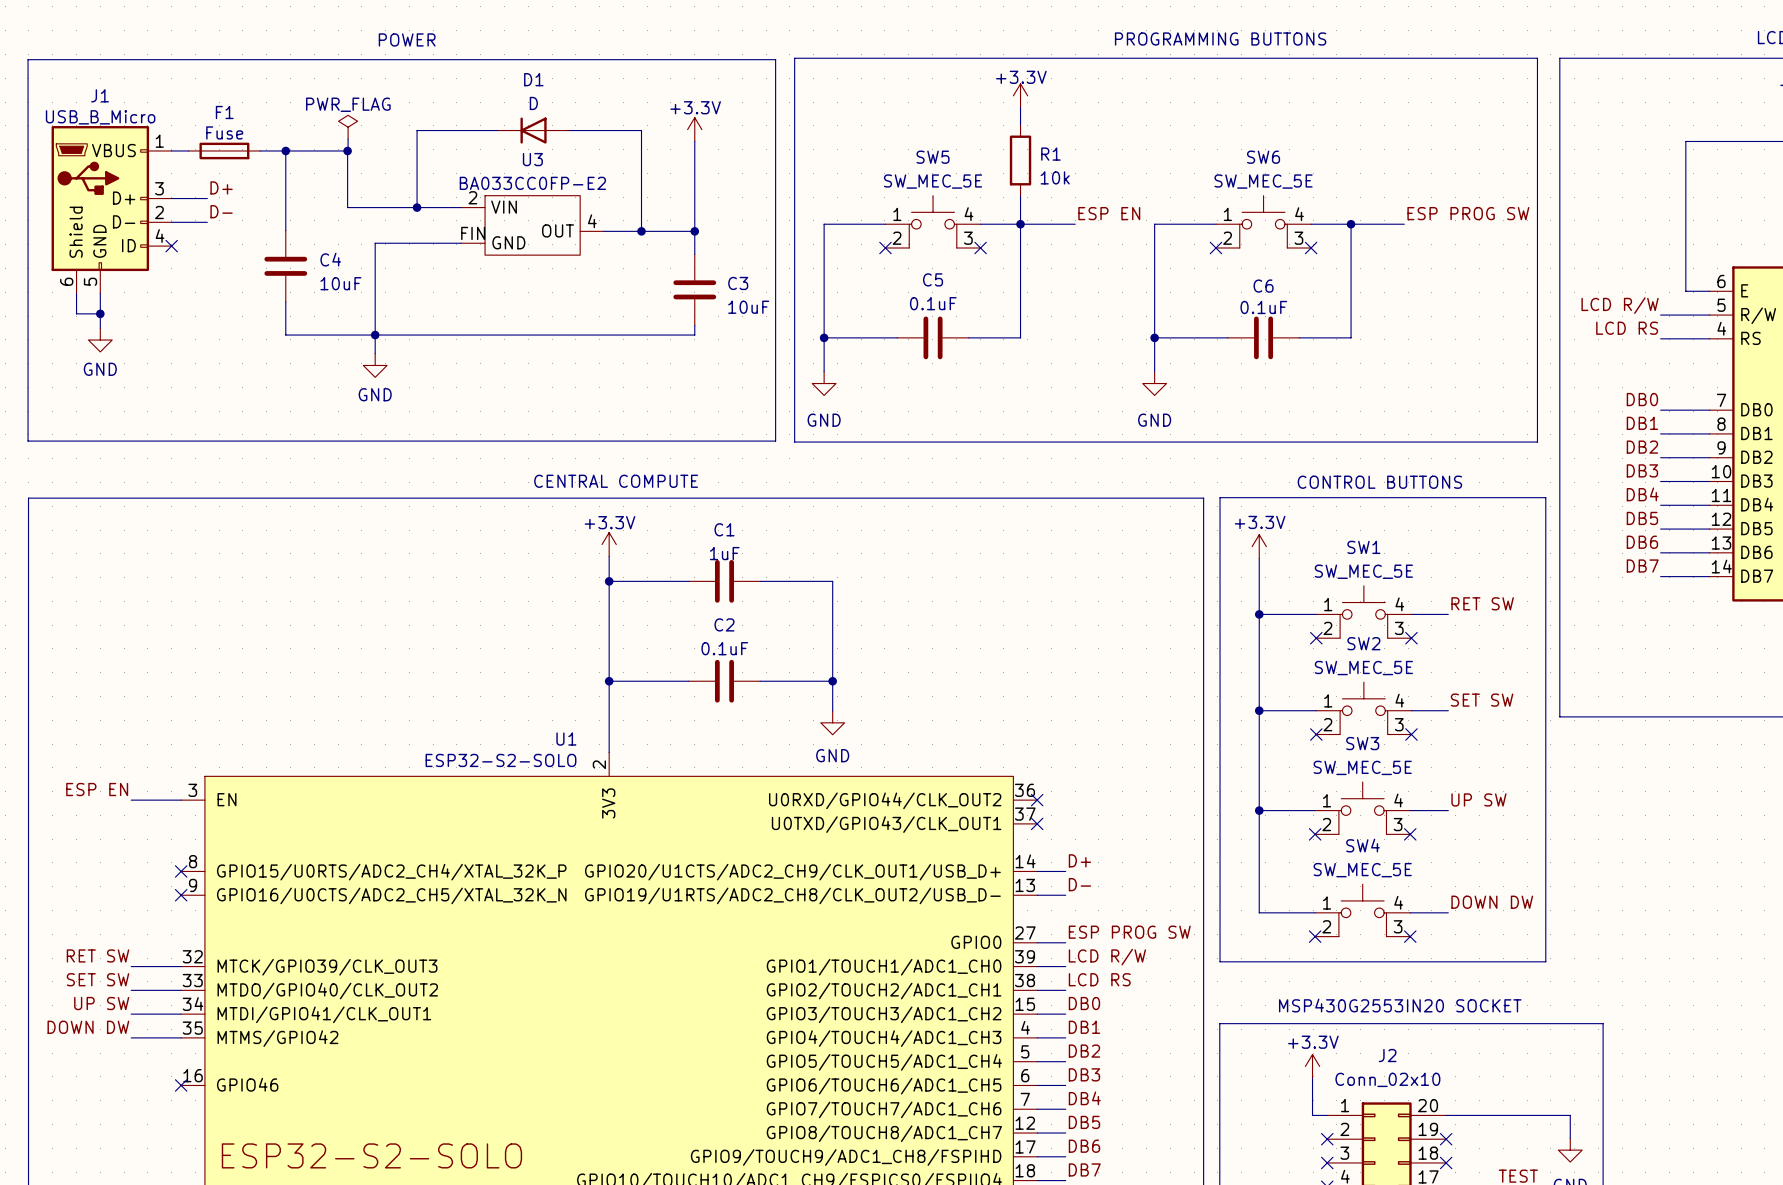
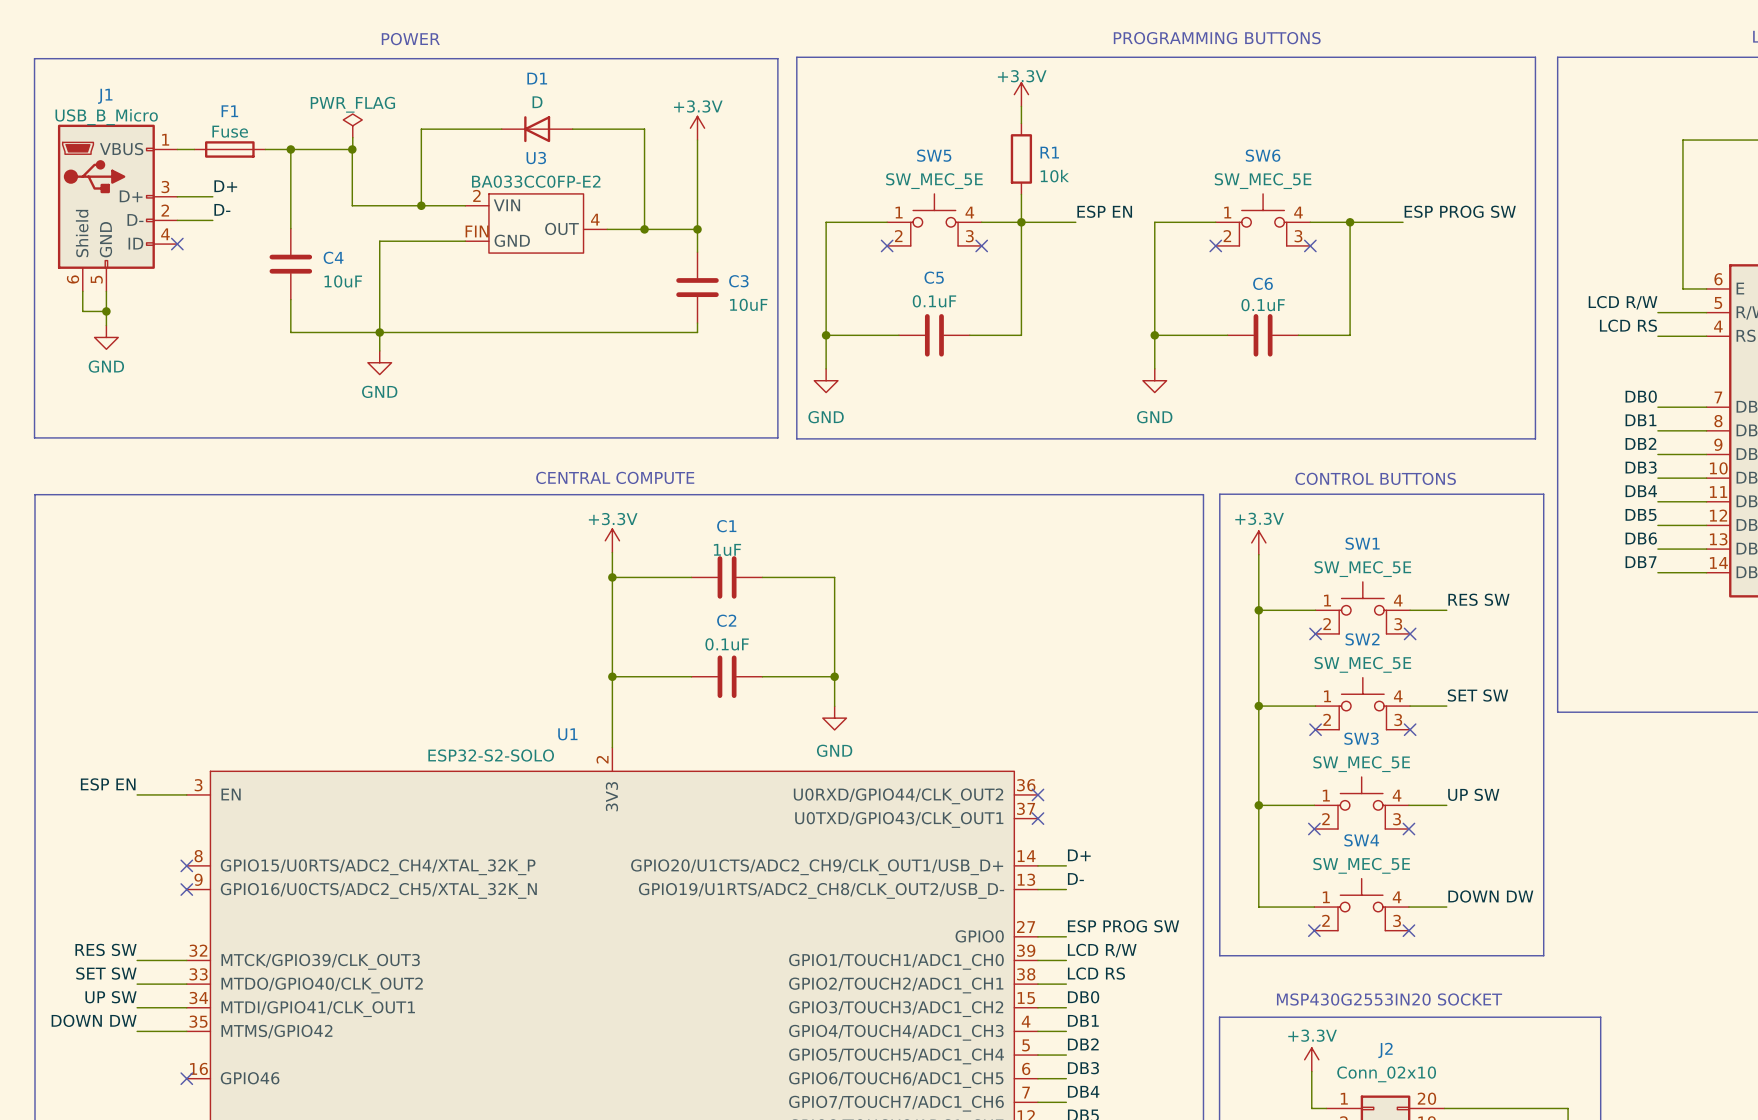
label: RET SW (1482, 603) -> RES SW (1478, 599)
label: RET SW (98, 955) -> RES SW (106, 949)

